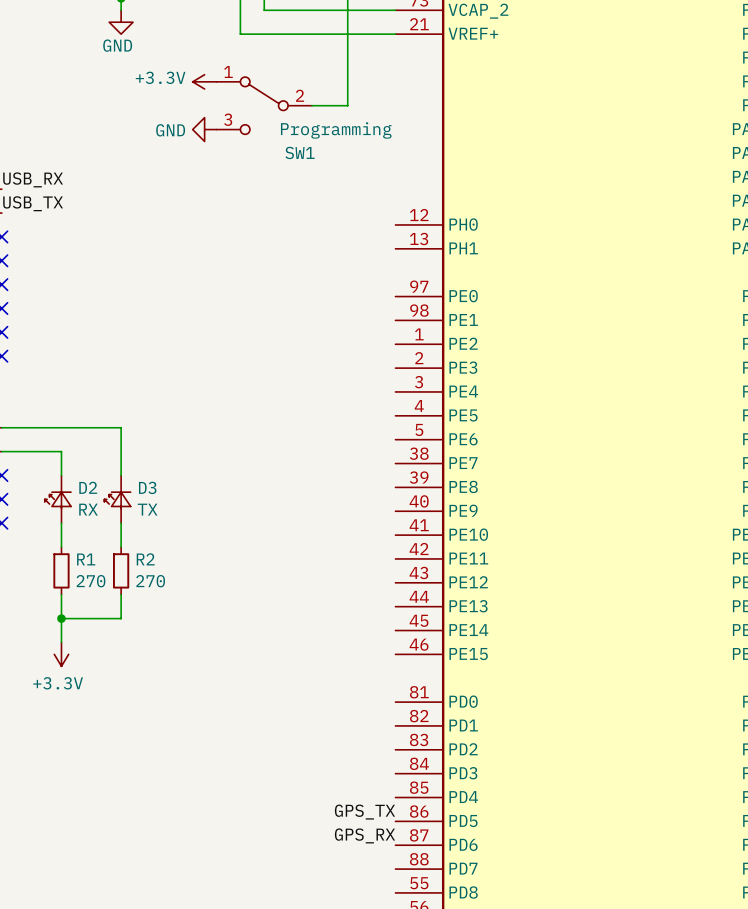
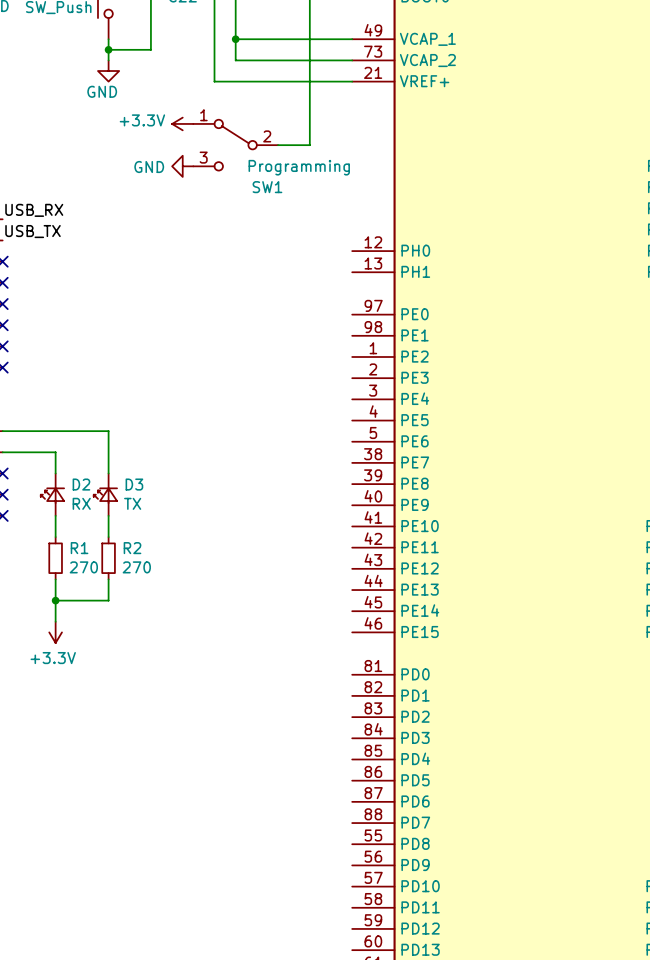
label: GPS_TX (364, 812) -> none
label: GPS_RX (364, 835) -> none

